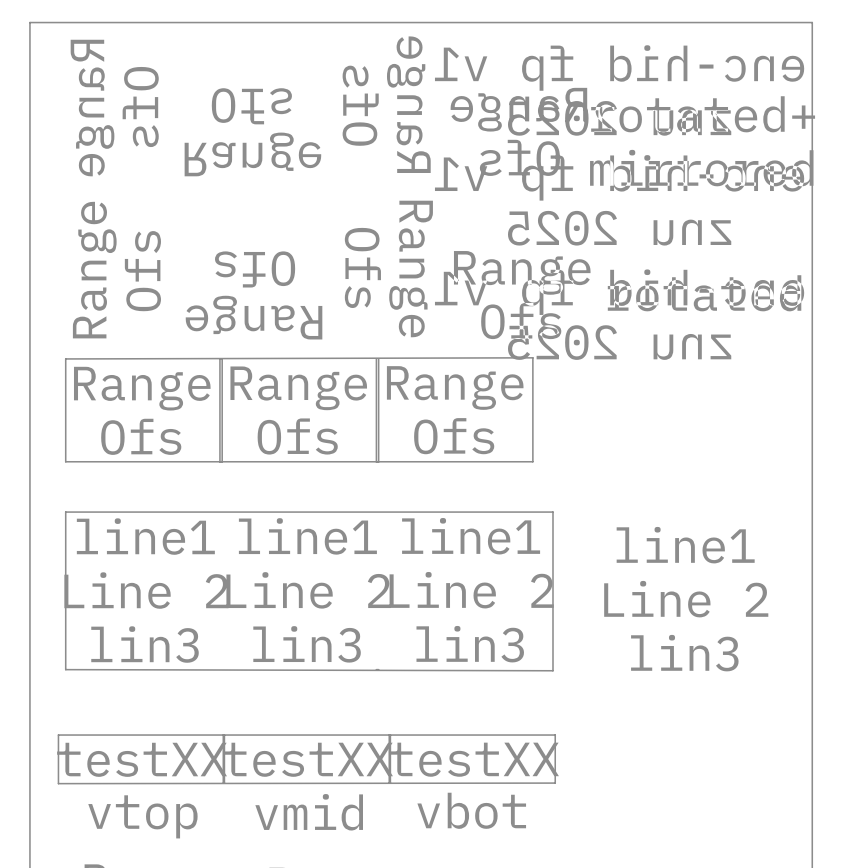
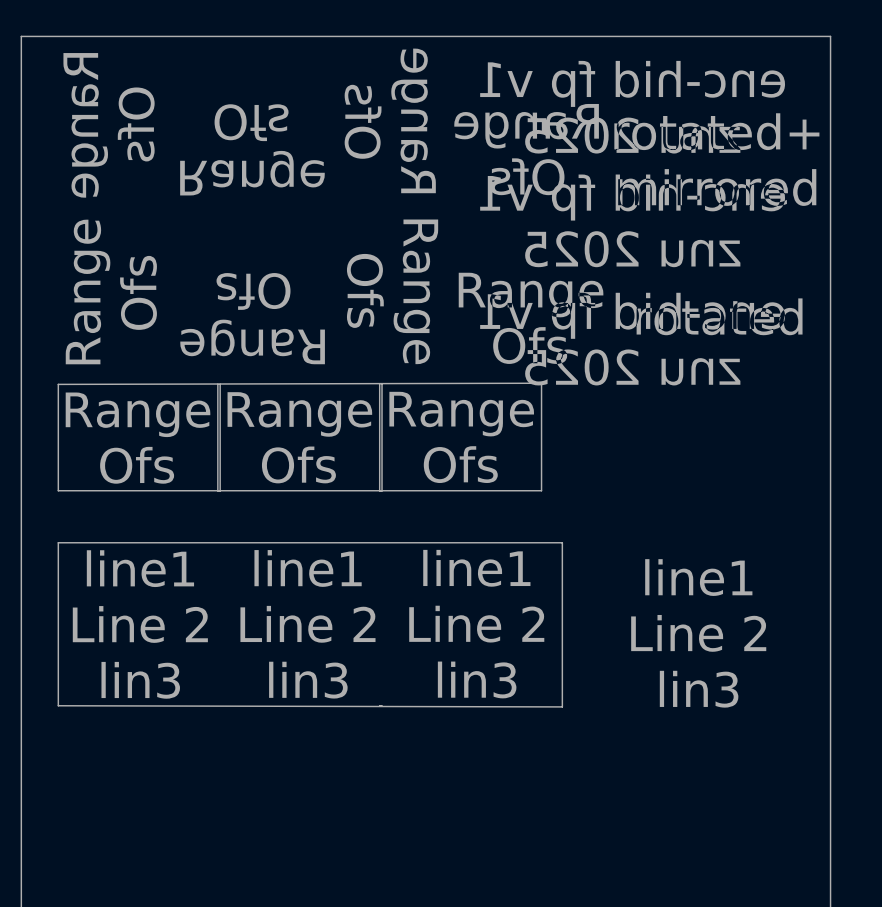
line: (58, 735) (555, 735) (555, 783) (58, 783) (58, 735) -> none
line: (223, 735) (223, 783) -> none
line: (224, 735) (224, 783) -> none
line: (389, 735) (389, 783) -> none
line: (390, 735) (390, 783) -> none
text: testXX (142, 759) -> none
text: testXX (308, 759) -> none
text: testXX (473, 759) -> none
text: vbot (471, 810) -> none
text: vmid (309, 812) -> none
text: vtop (142, 816) -> none

